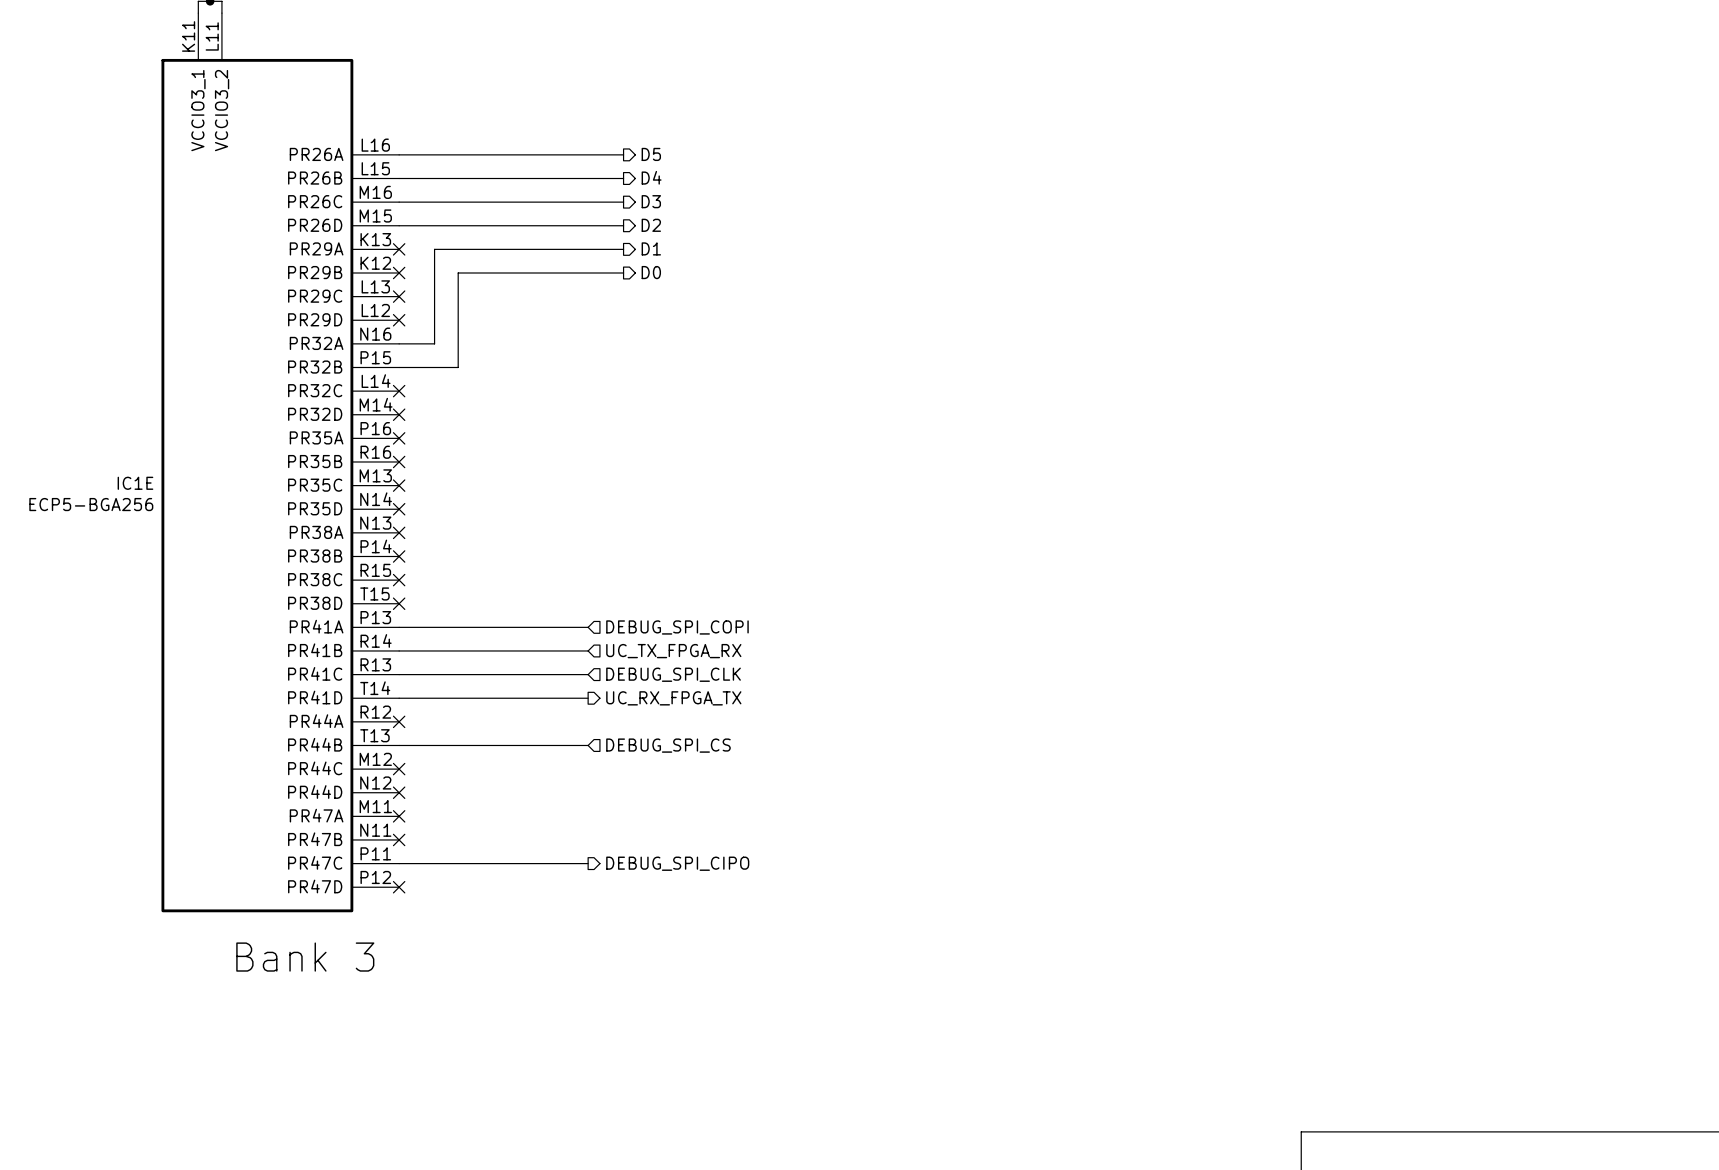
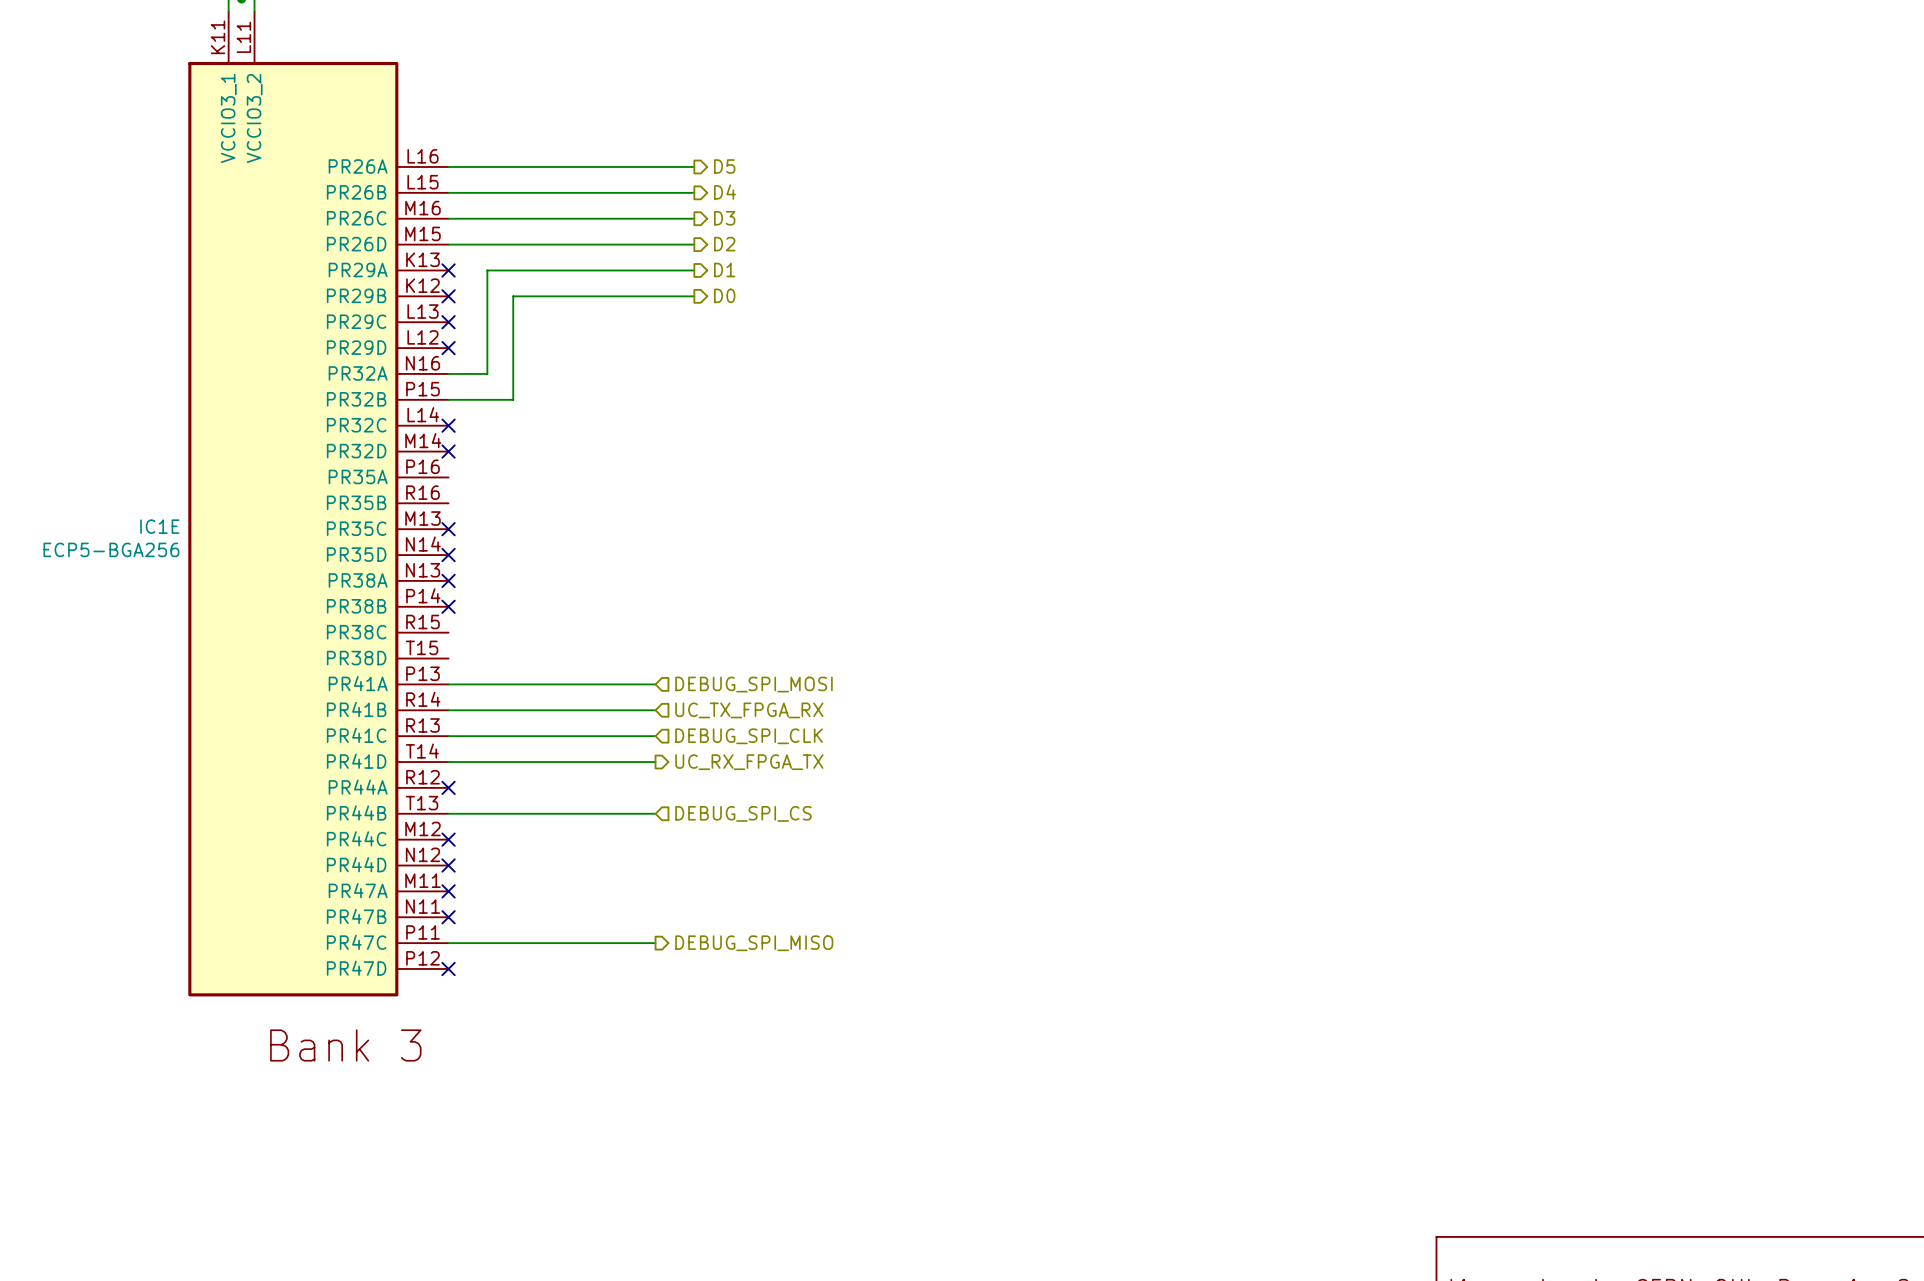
no-connect mark: (399, 438) -> none
no-connect mark: (399, 461) -> none
no-connect mark: (399, 580) -> none
no-connect mark: (399, 603) -> none
hierarchical label: DEBUG_SPI_COPI (677, 627) -> DEBUG_SPI_MOSI (753, 684)
hierarchical label: DEBUG_SPI_CIPO (677, 863) -> DEBUG_SPI_MISO (754, 943)

